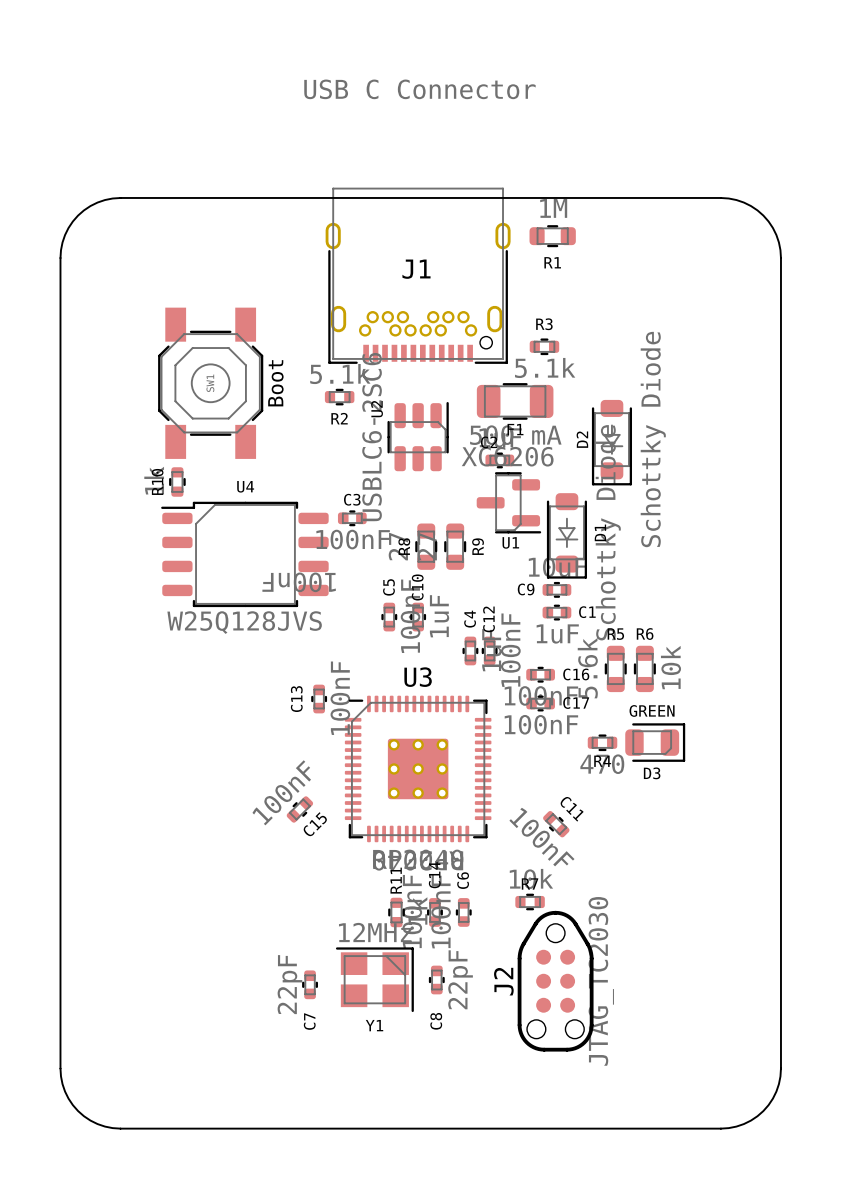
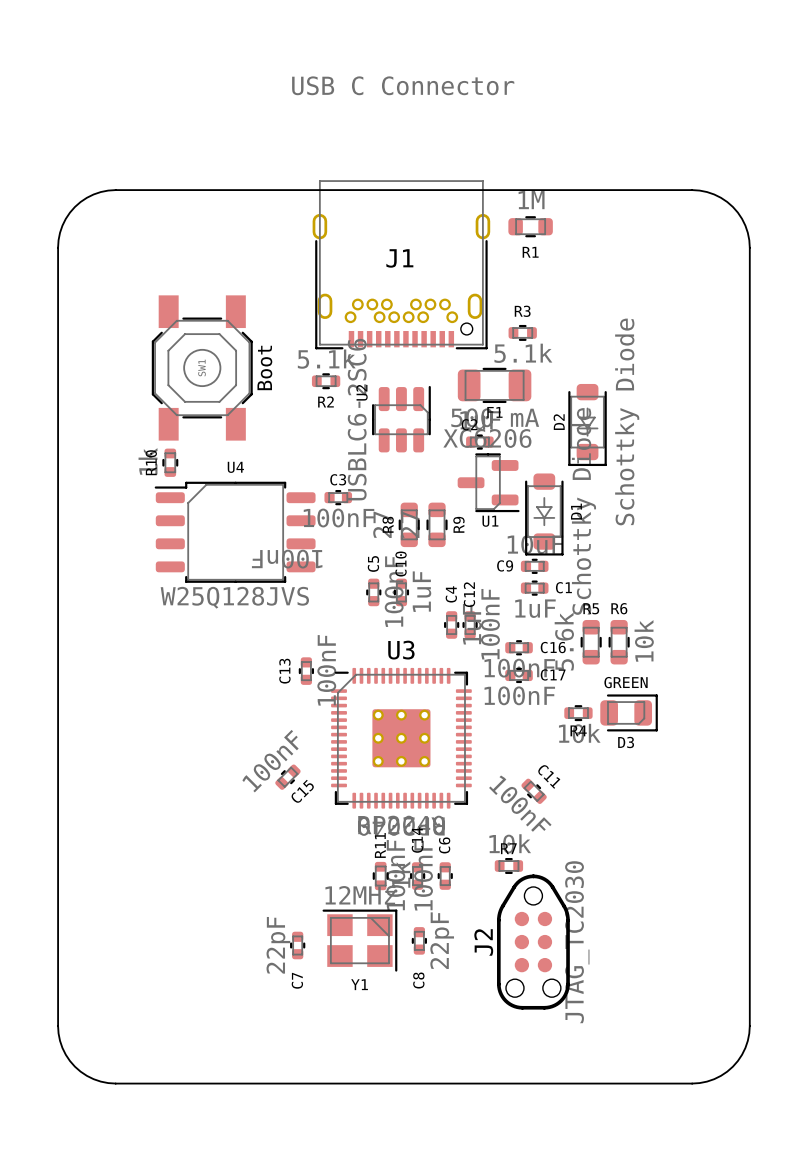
R4 value: 470 (602, 764) -> 10k (579, 733)

